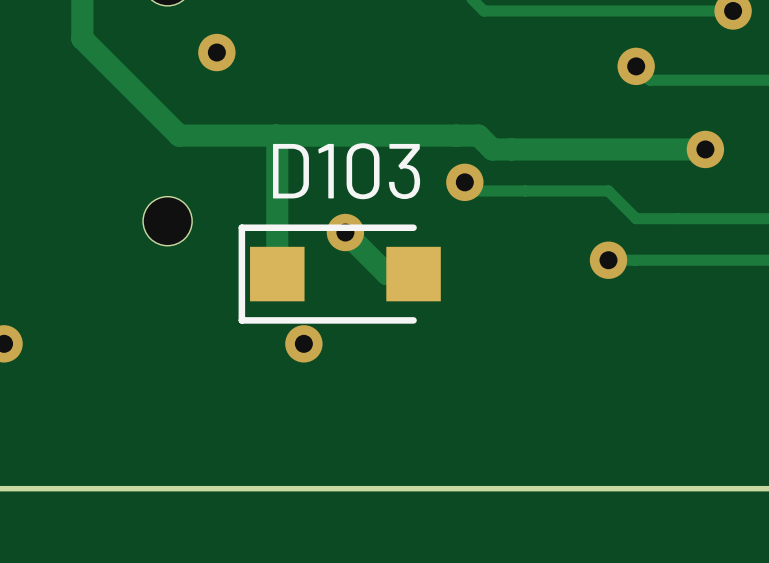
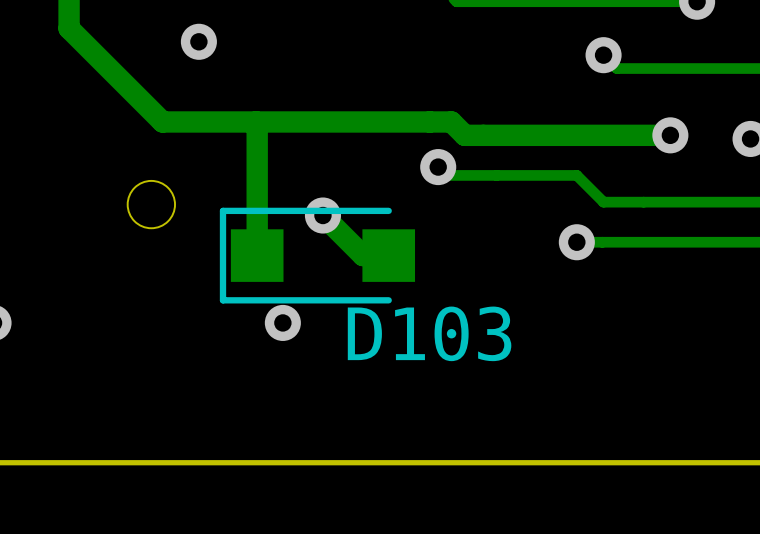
D103 name position: D103 (346, 171) -> D103 (429, 333)

